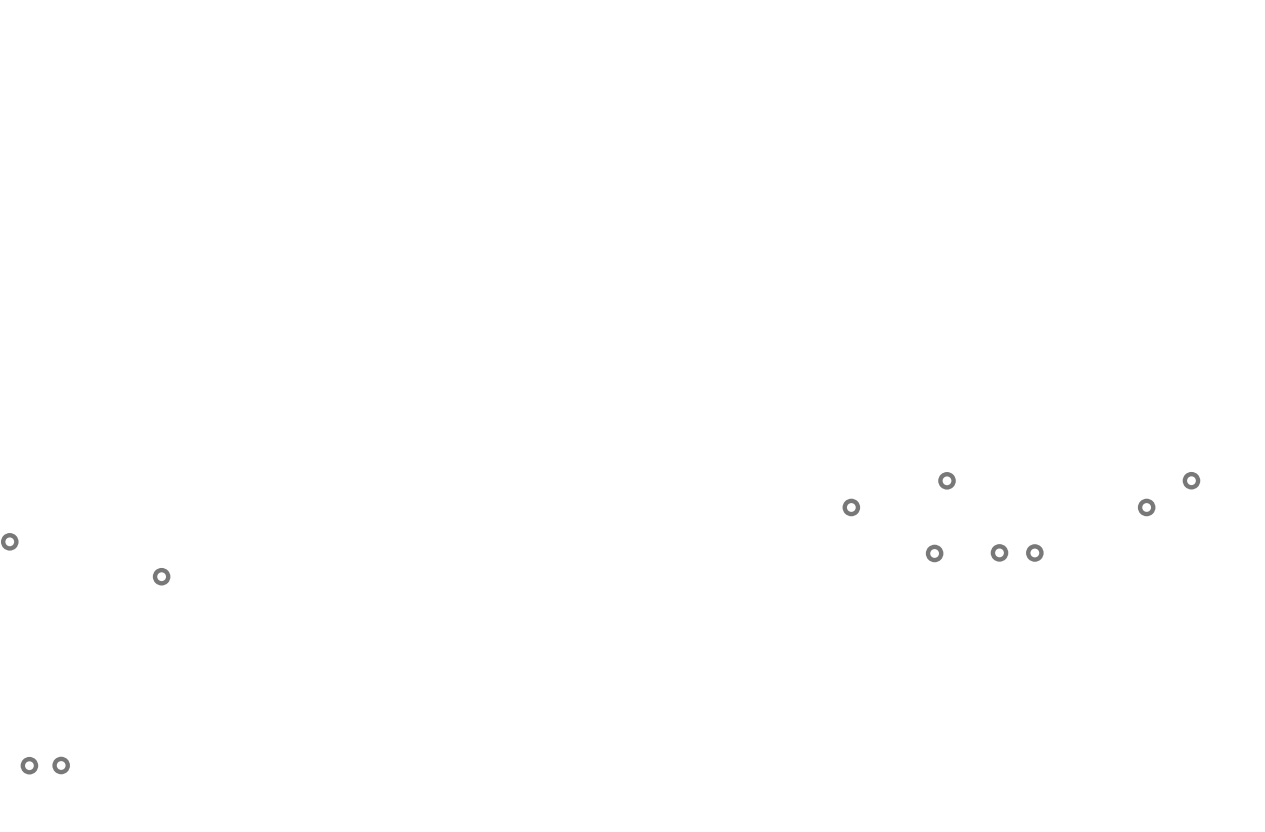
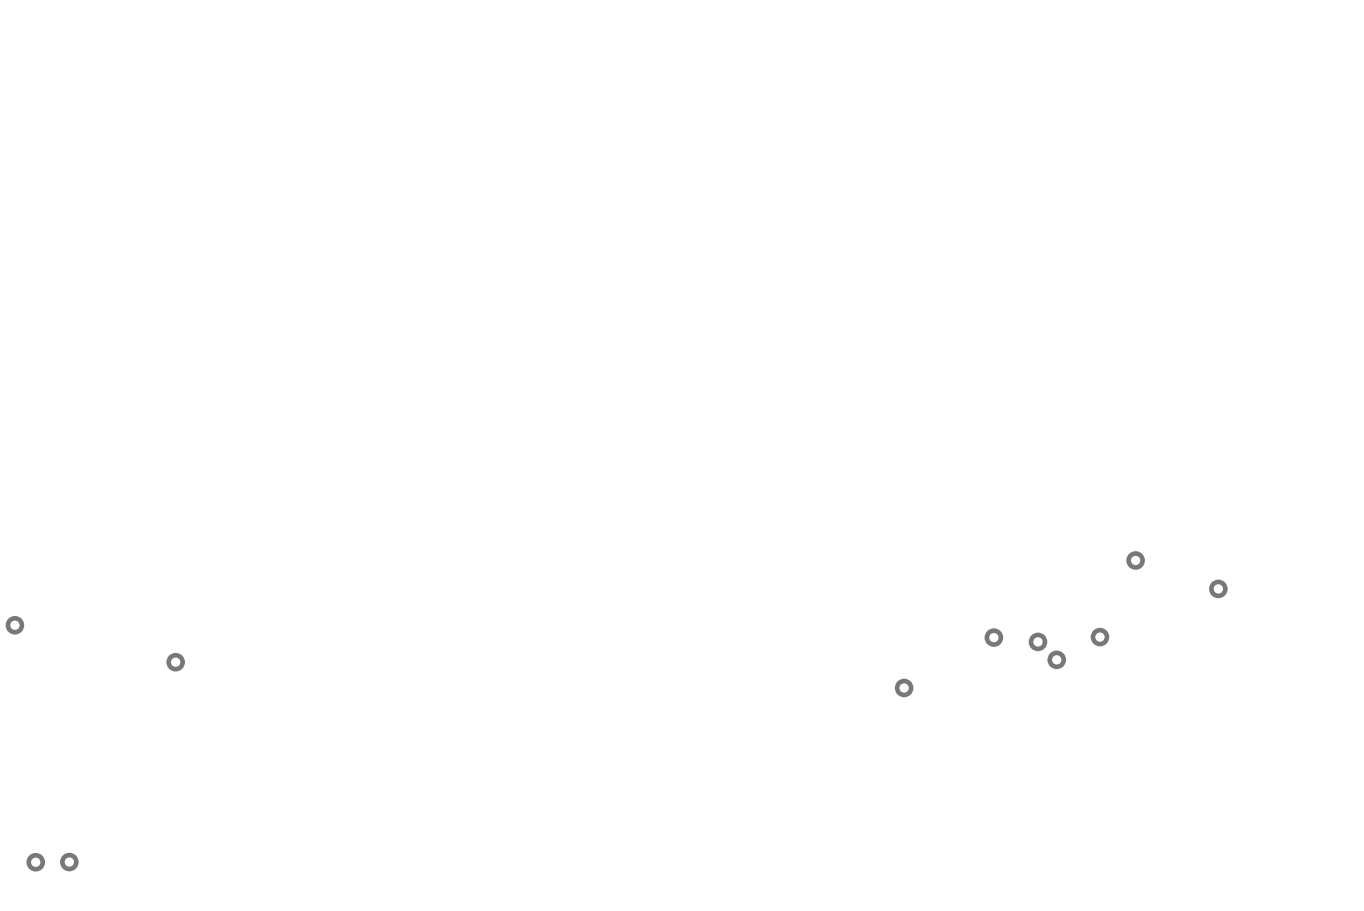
via: (947, 480) -> none
via: none -> (1135, 560)
via: (1191, 480) -> none
via: (851, 507) -> none
via: (999, 552) -> none
via: none -> (1037, 641)
via: none -> (1056, 659)
via: none -> (904, 687)

